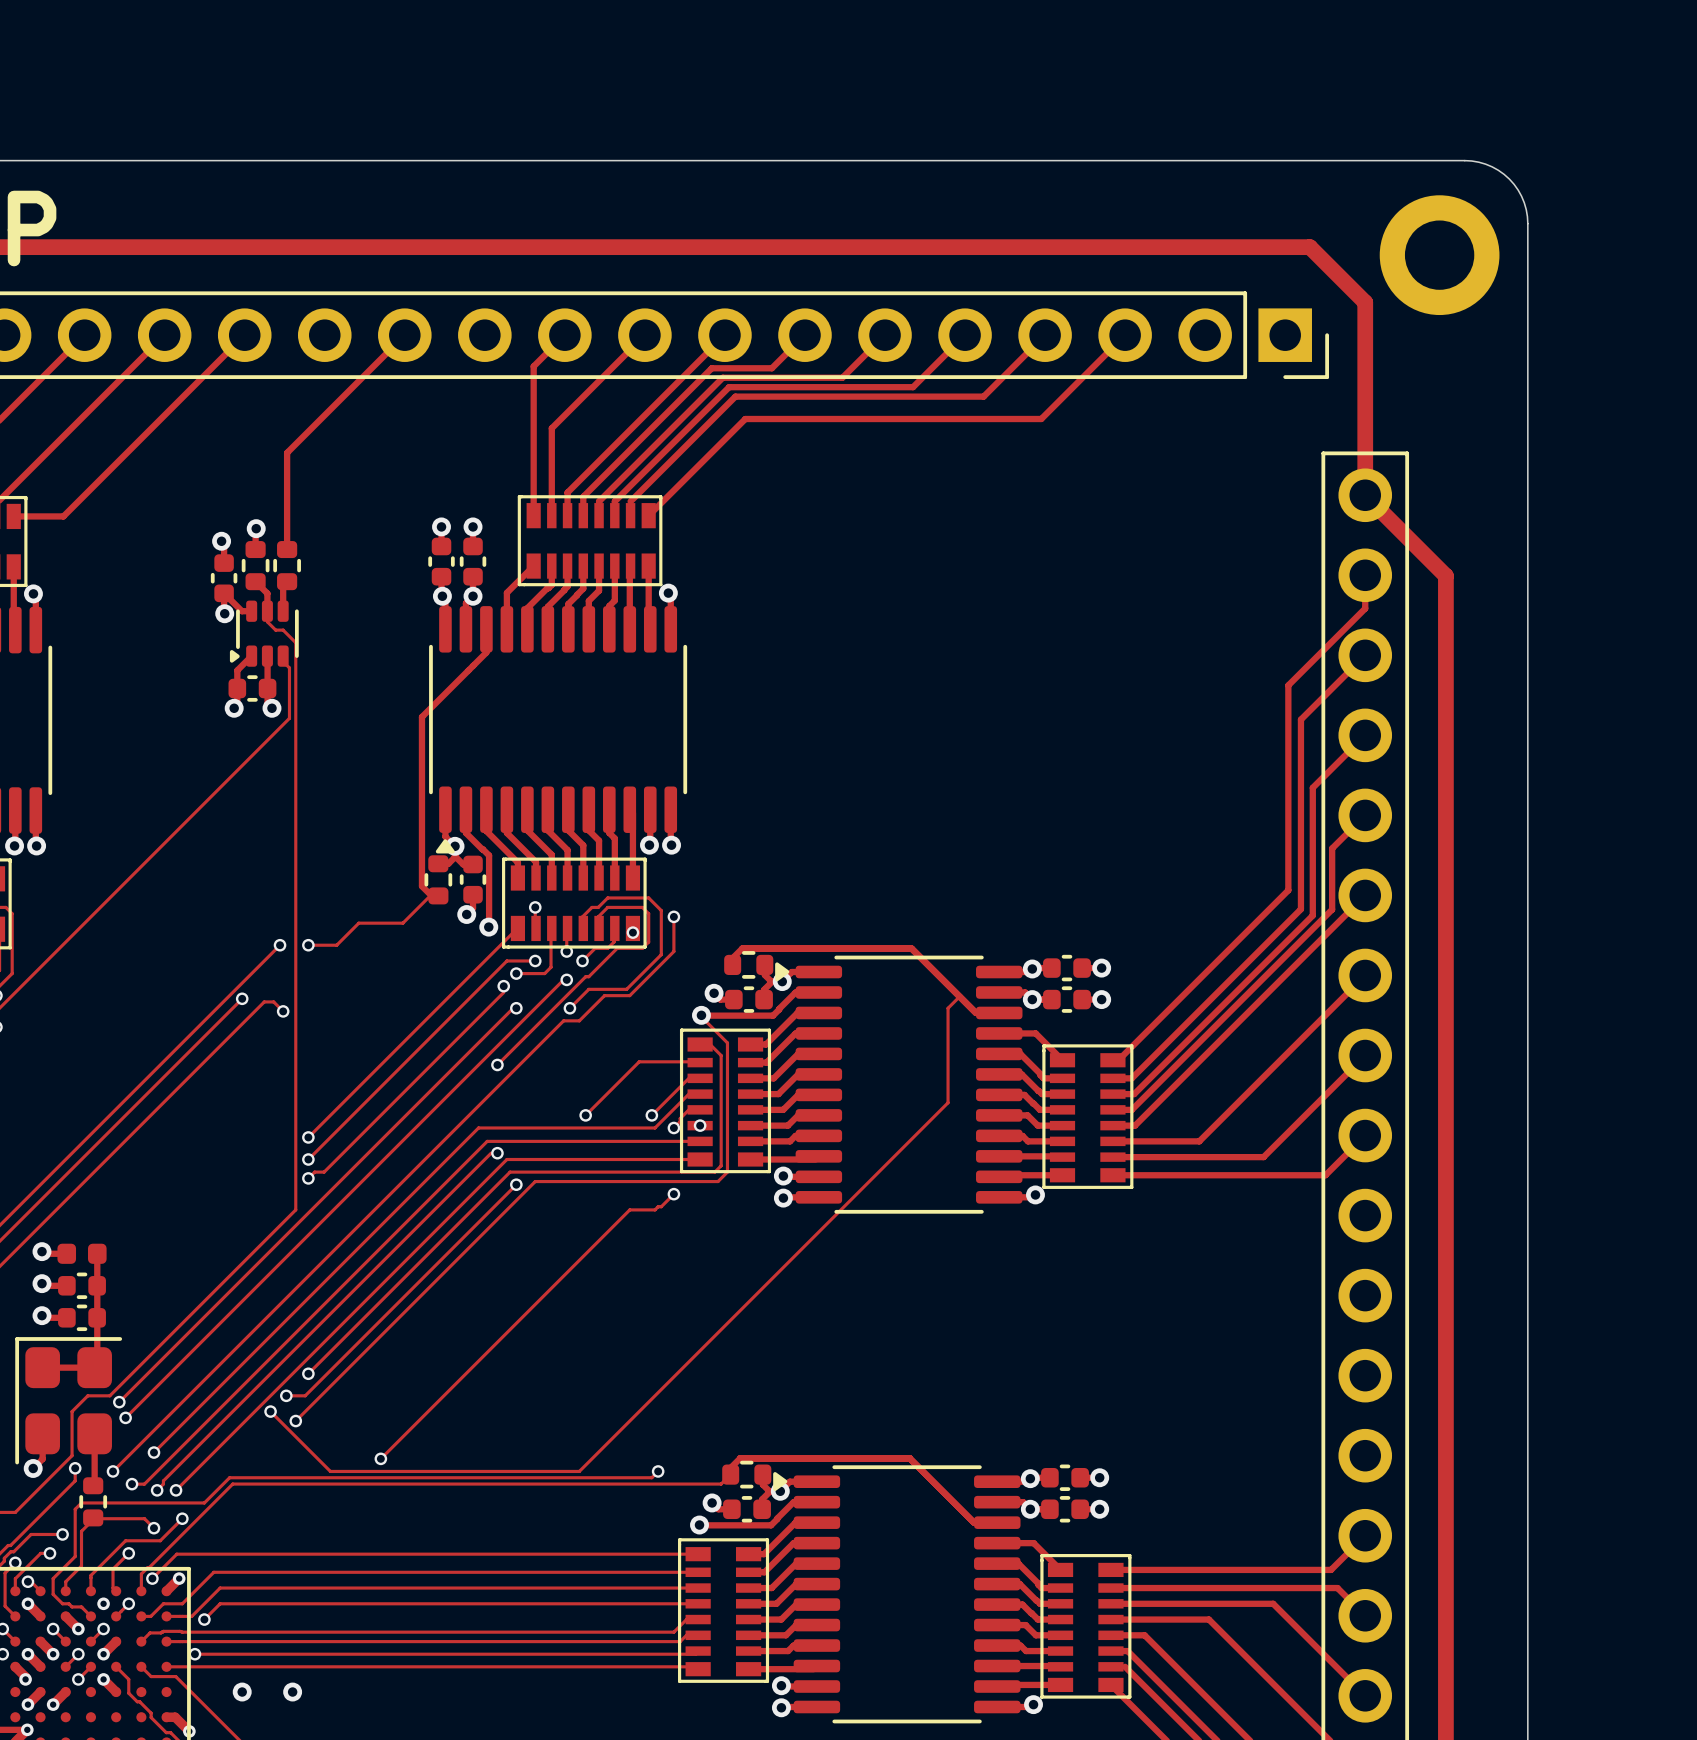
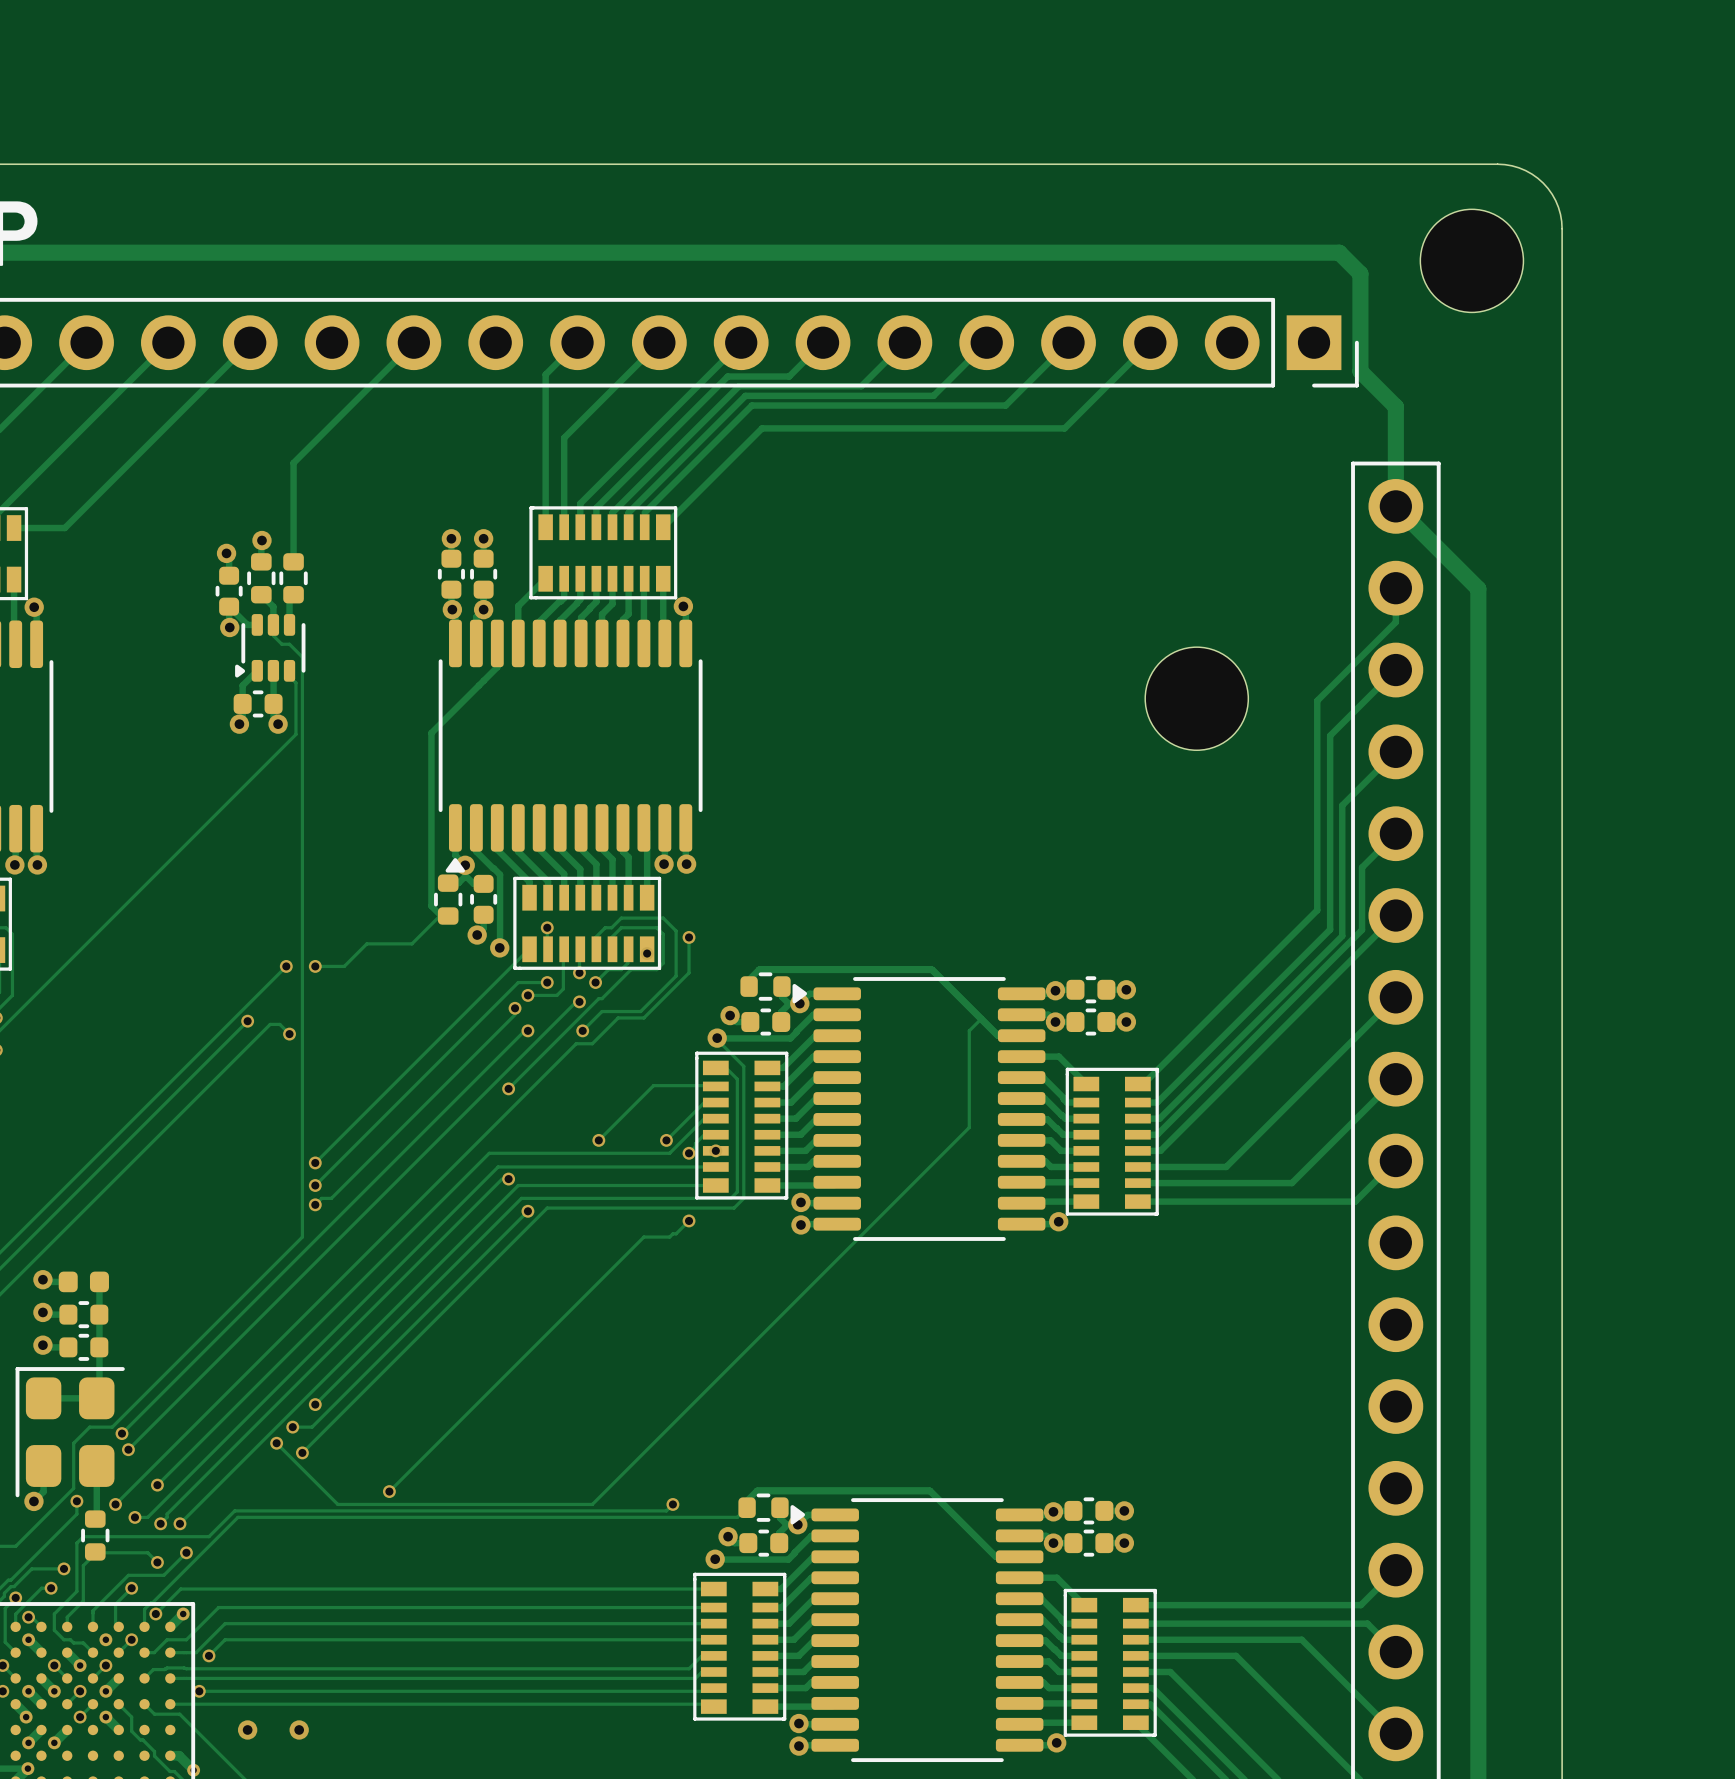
part footprint: [1379, 195, 1500, 316] -> [1420, 209, 1524, 313]
track: (1330, 267) (1365, 302) (1365, 397) -> (1360, 273) (1360, 371) (1395, 406)
part: none -> (1196, 698)

